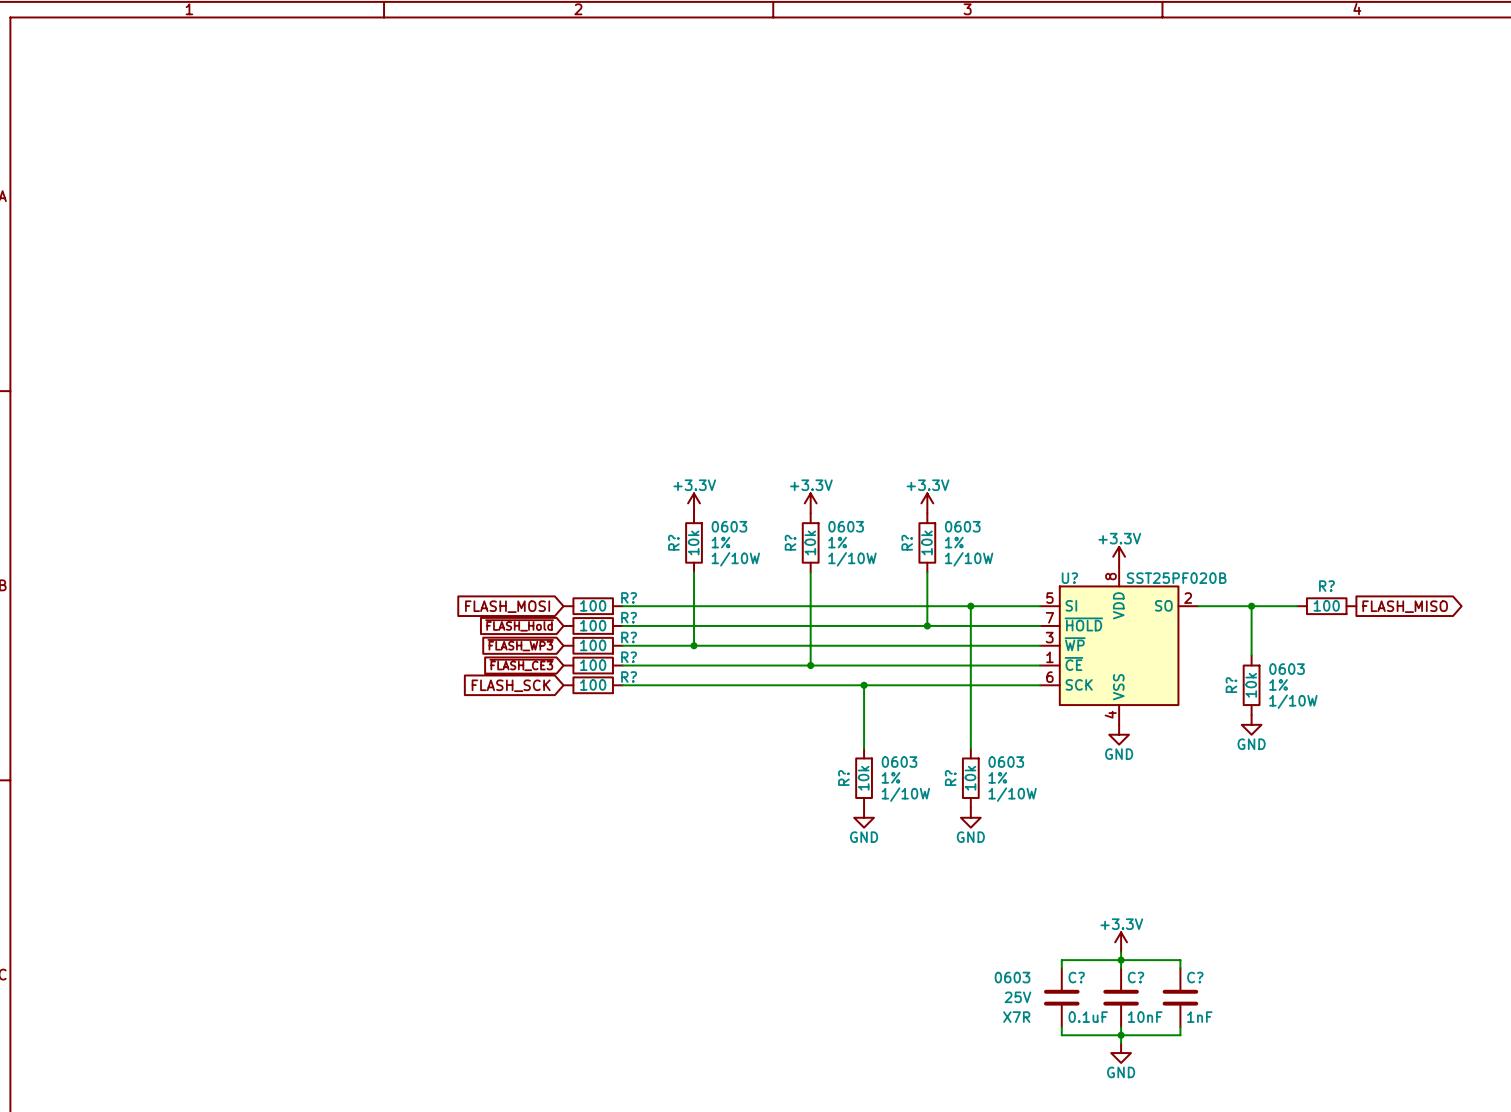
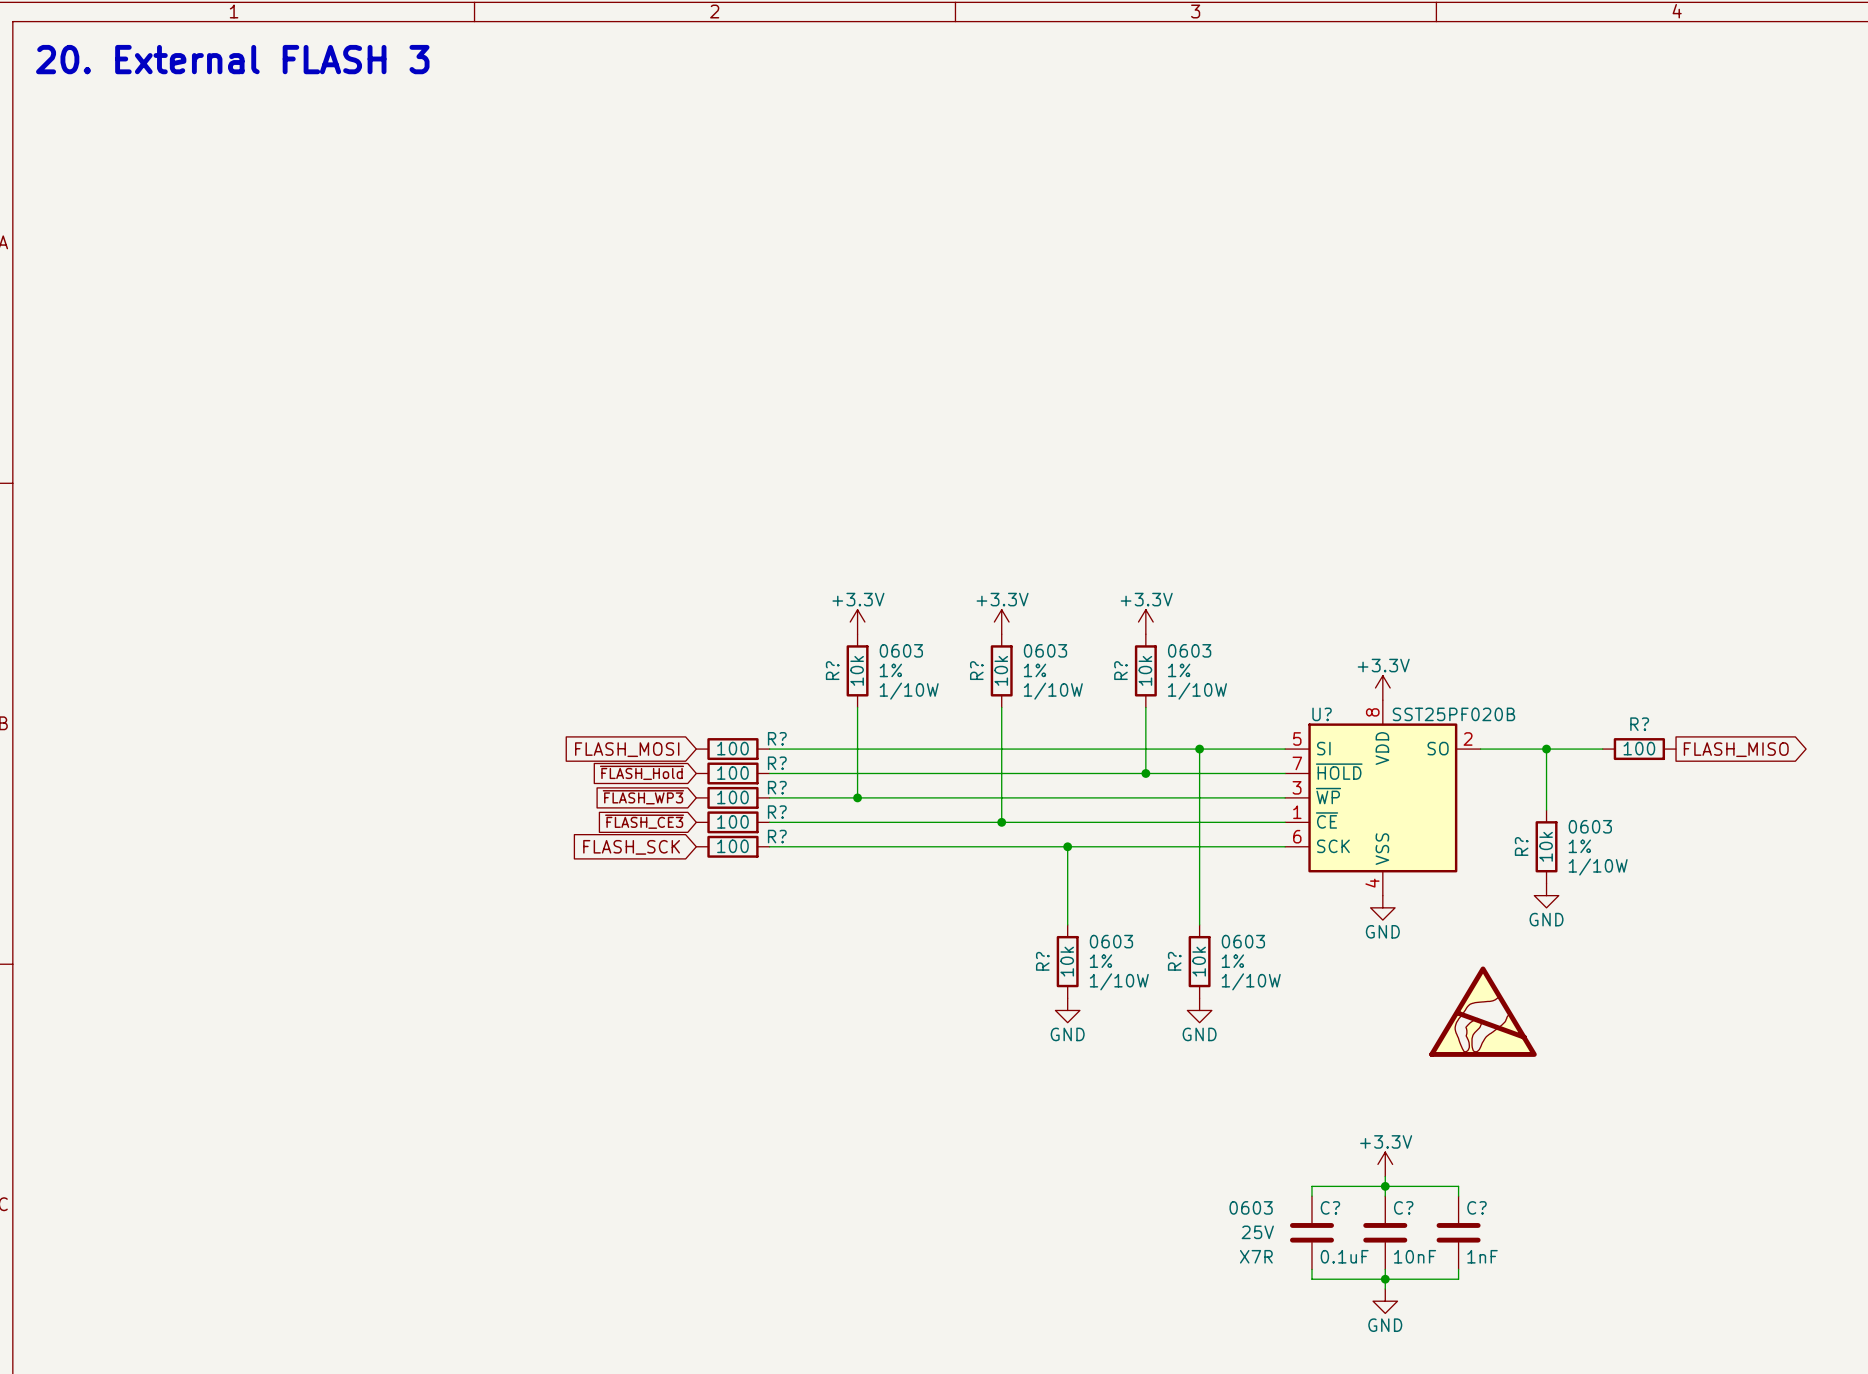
text: none -> 20. External FLASH 3 (232, 59)
power symbol: none -> (1483, 1011)

